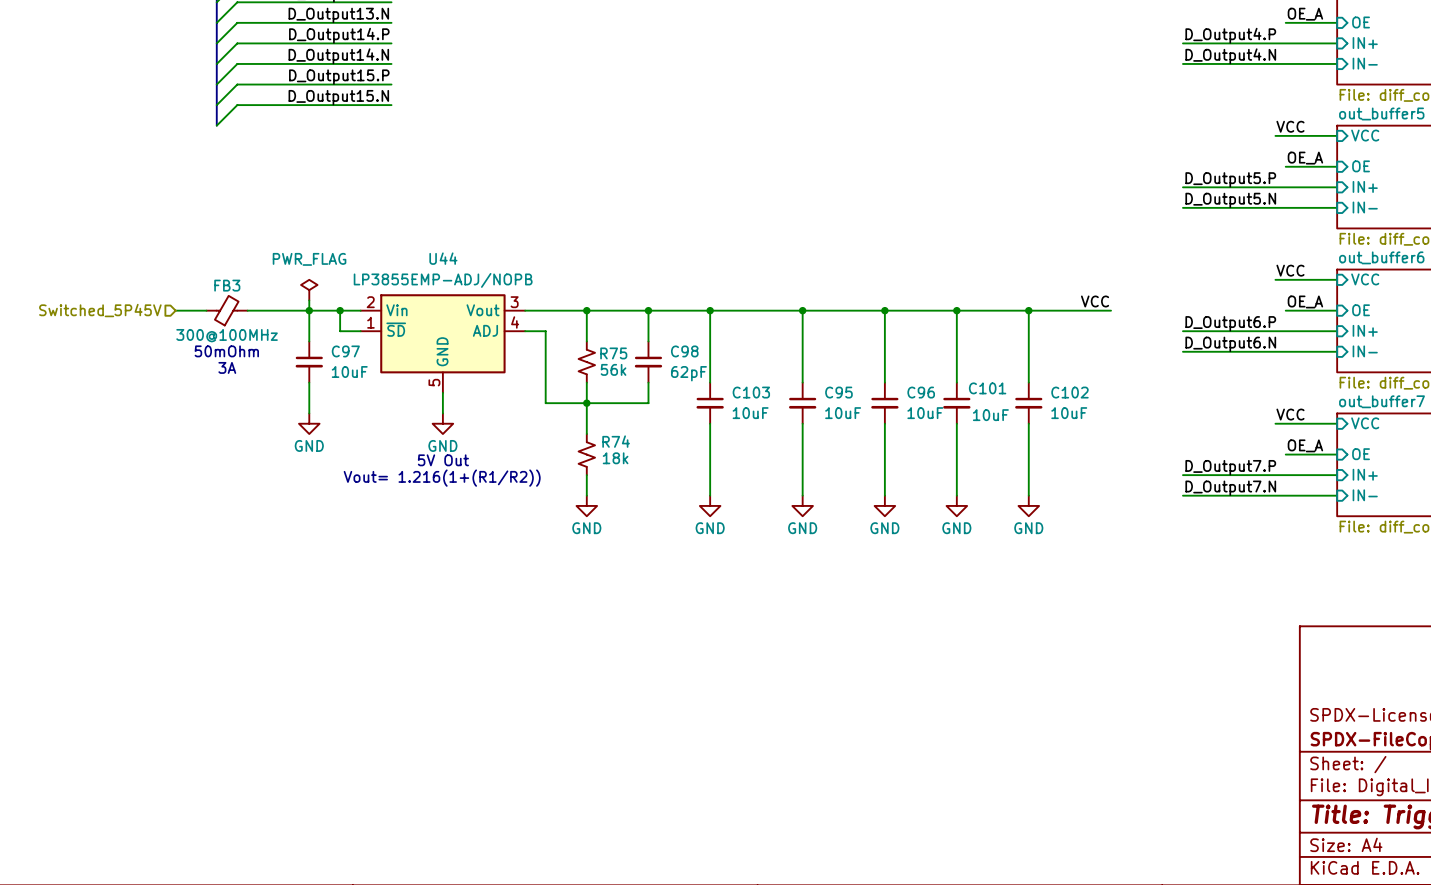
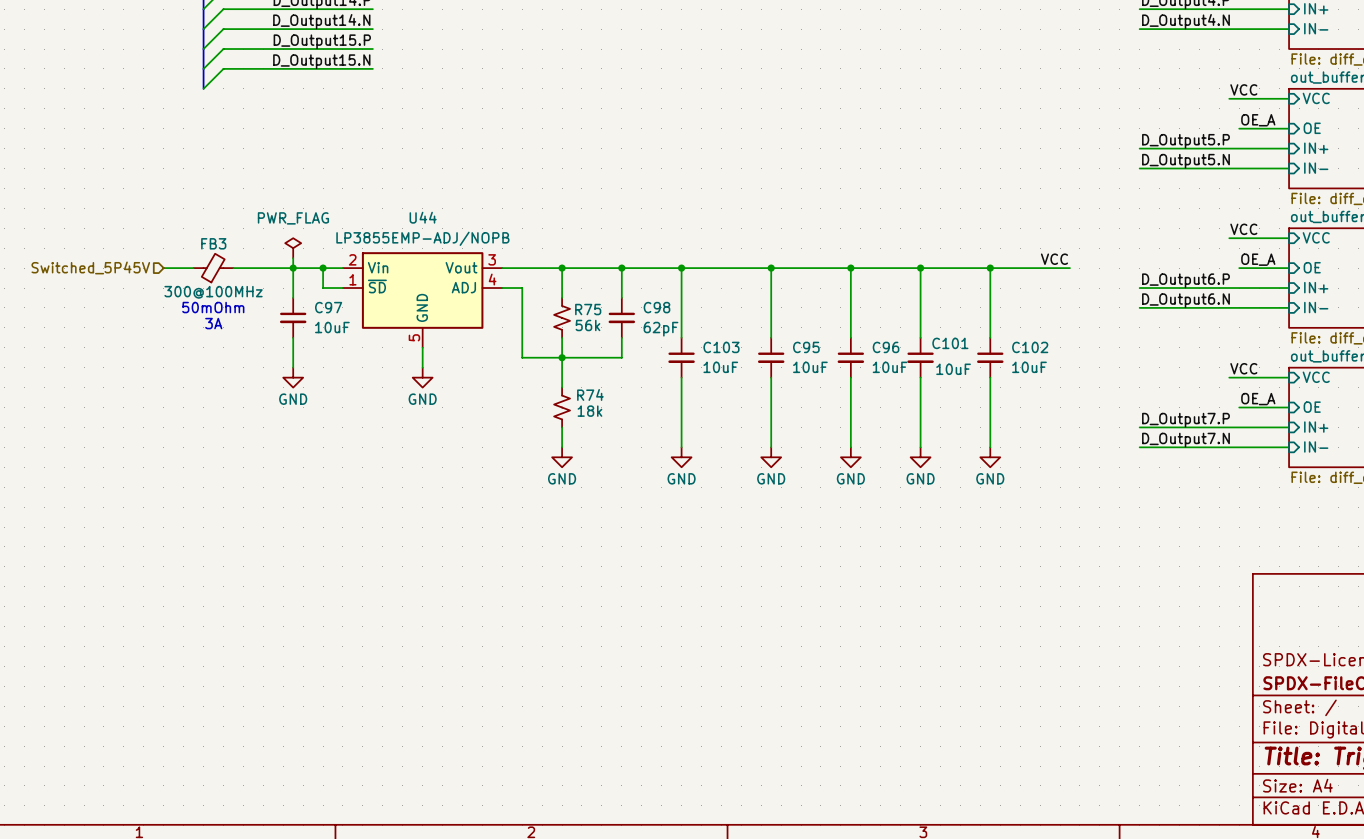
text: 5V Out (443, 460) -> none
text: Vout= 1.216(1+(R1/R2)) (442, 478) -> none

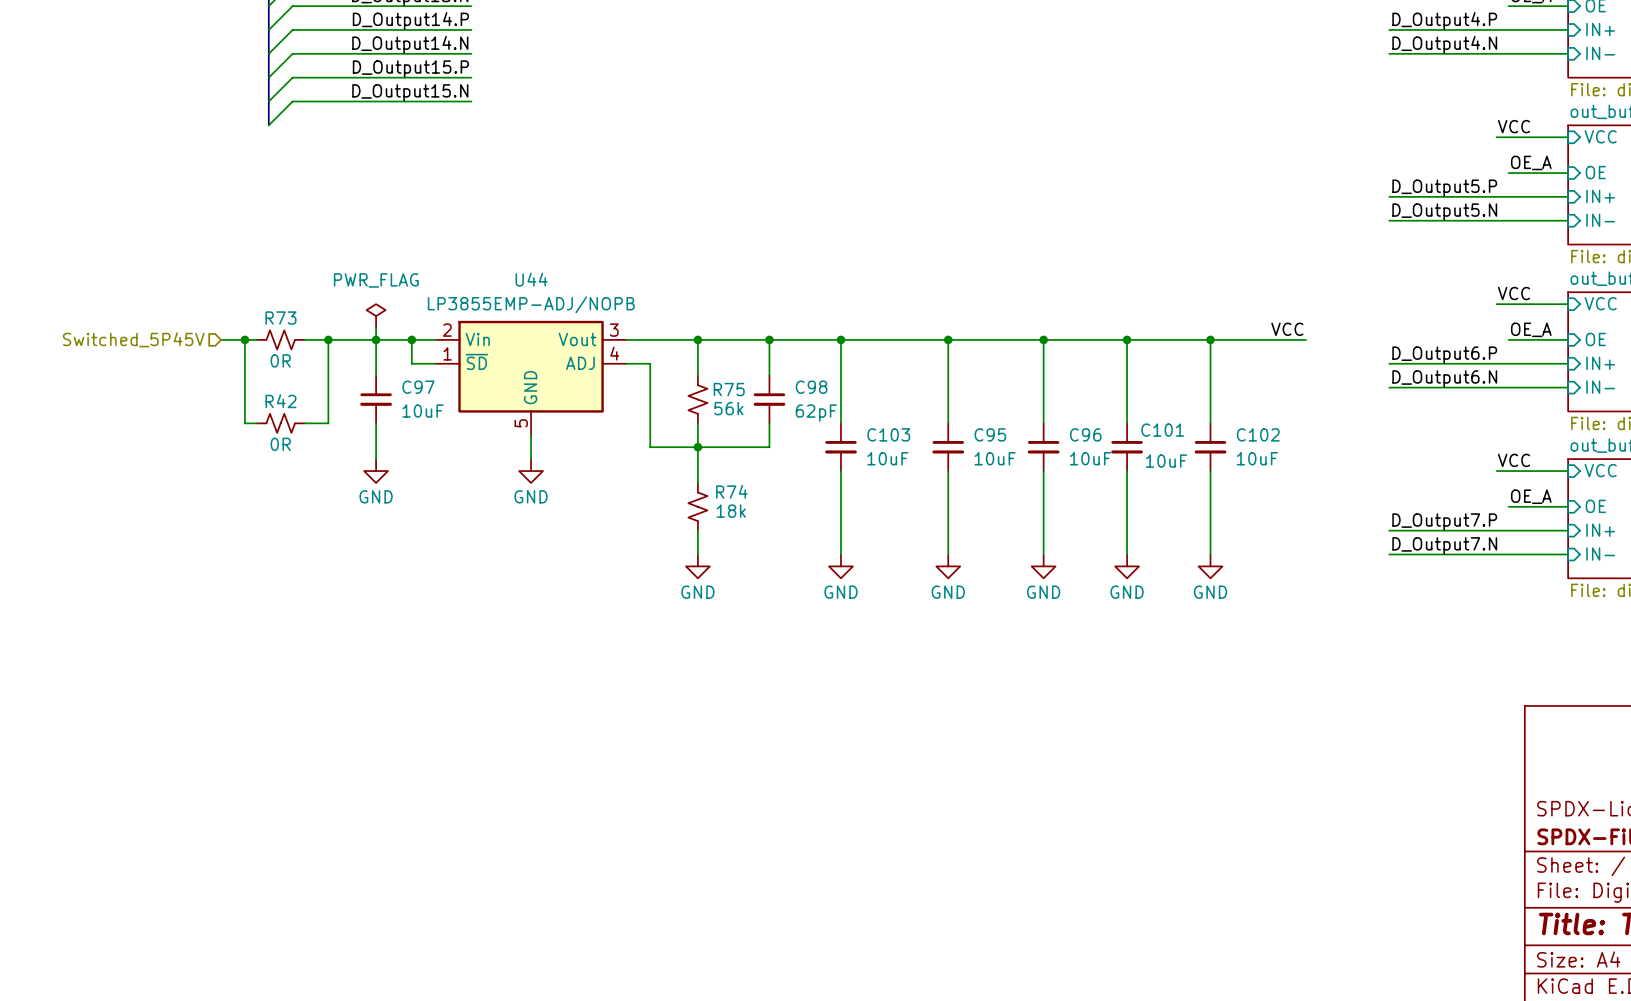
wire: none -> (244, 339) (244, 423) (256, 423)
junction: none -> (244, 339)
FB3: 300@100MHz (213, 268) -> none
R73: none -> 0R (280, 339)
wire: none -> (328, 339) (328, 423) (304, 423)
junction: none -> (328, 339)
text: 50mOhm (213, 307) -> none
text: 3A (213, 323) -> none
R42: none -> 0R (280, 423)

